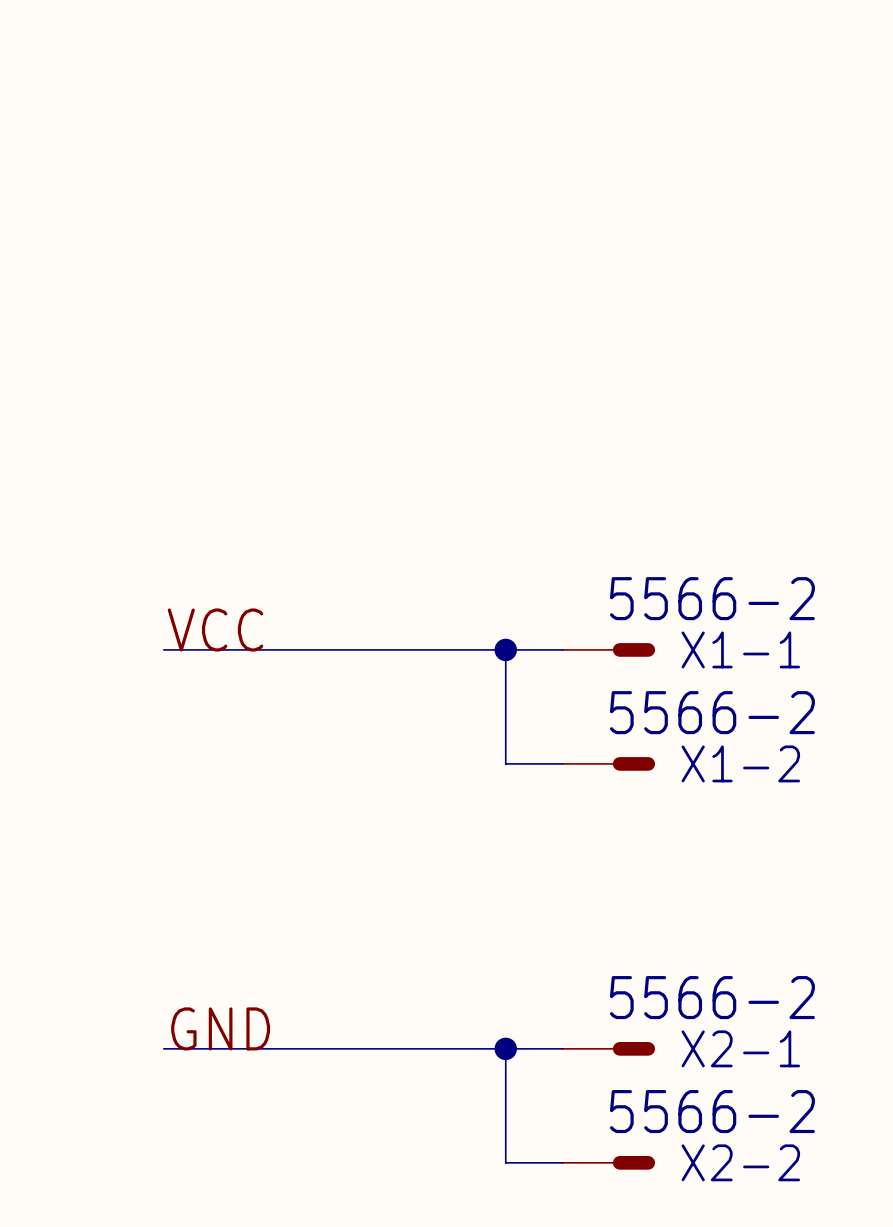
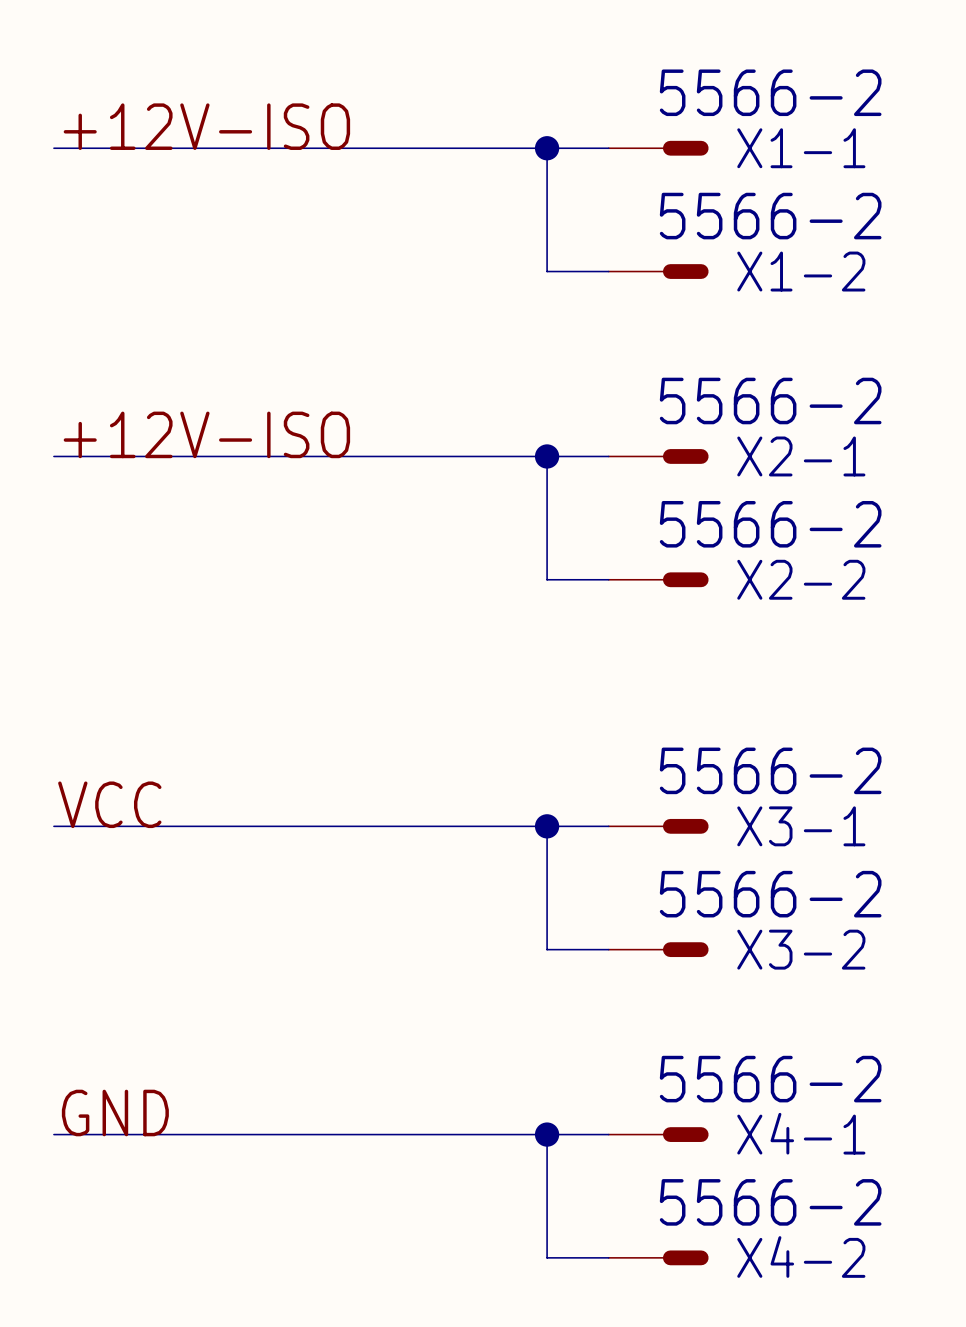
label: none -> +12V-ISO (206, 126)
wire: none -> (53, 148) (608, 148)
wire: none -> (547, 148) (547, 271) (608, 271)
junction: none -> (547, 148)
X1-2: none -> 5566-2 (658, 271)
label: none -> +12V-ISO (206, 434)
wire: none -> (53, 456) (608, 456)
wire: none -> (547, 456) (547, 579) (608, 579)
junction: none -> (547, 456)
X2-1: none -> 5566-2 (658, 456)
X2-2: none -> 5566-2 (658, 579)
label position: VCC (215, 629) -> VCC (109, 804)
wire: (163, 649) (562, 649) -> none
wire: (505, 649) (505, 763) -> none
junction: (505, 649) -> none
X1-1 position: (608, 649) -> (658, 148)
wire: none -> (53, 826) (547, 826) (547, 949) (608, 949)
junction: none -> (547, 826)
X1-2 name: X1-2 (740, 763) -> X3-1 (801, 826)
X3-2: none -> 5566-2 (658, 949)
label position: GND (220, 1028) -> GND (115, 1113)
wire: none -> (53, 1134) (177, 1134)
X2-1 name: X2-1 (740, 1048) -> X4-1 (801, 1133)
X2-2 name: X2-2 (740, 1162) -> X4-2 (801, 1256)

